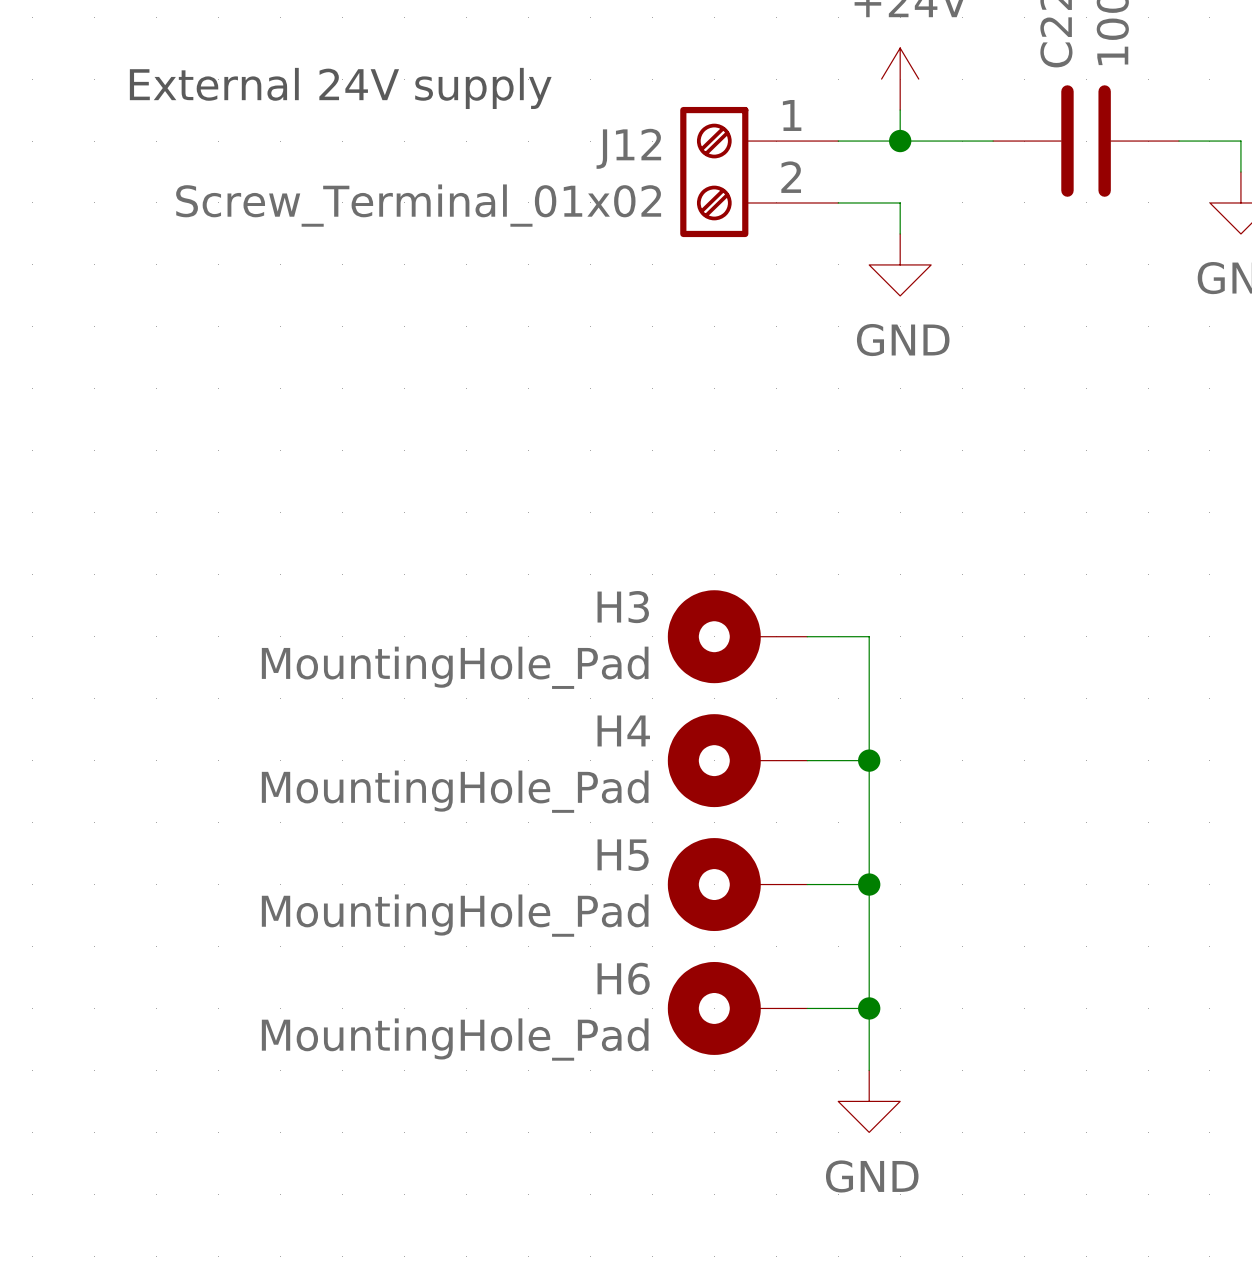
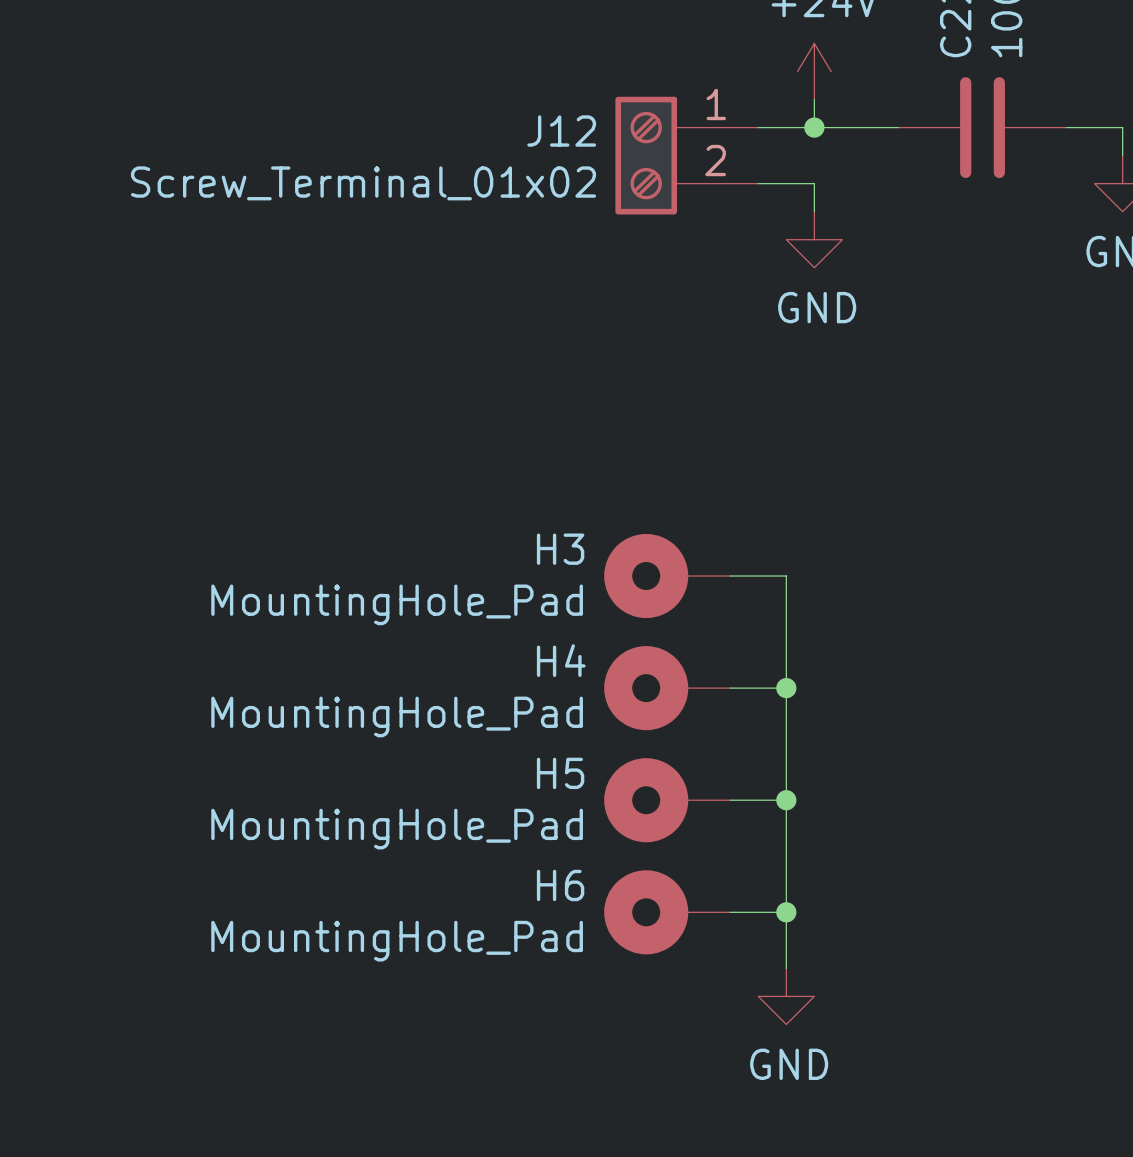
text: External 24V supply (340, 88) -> none

